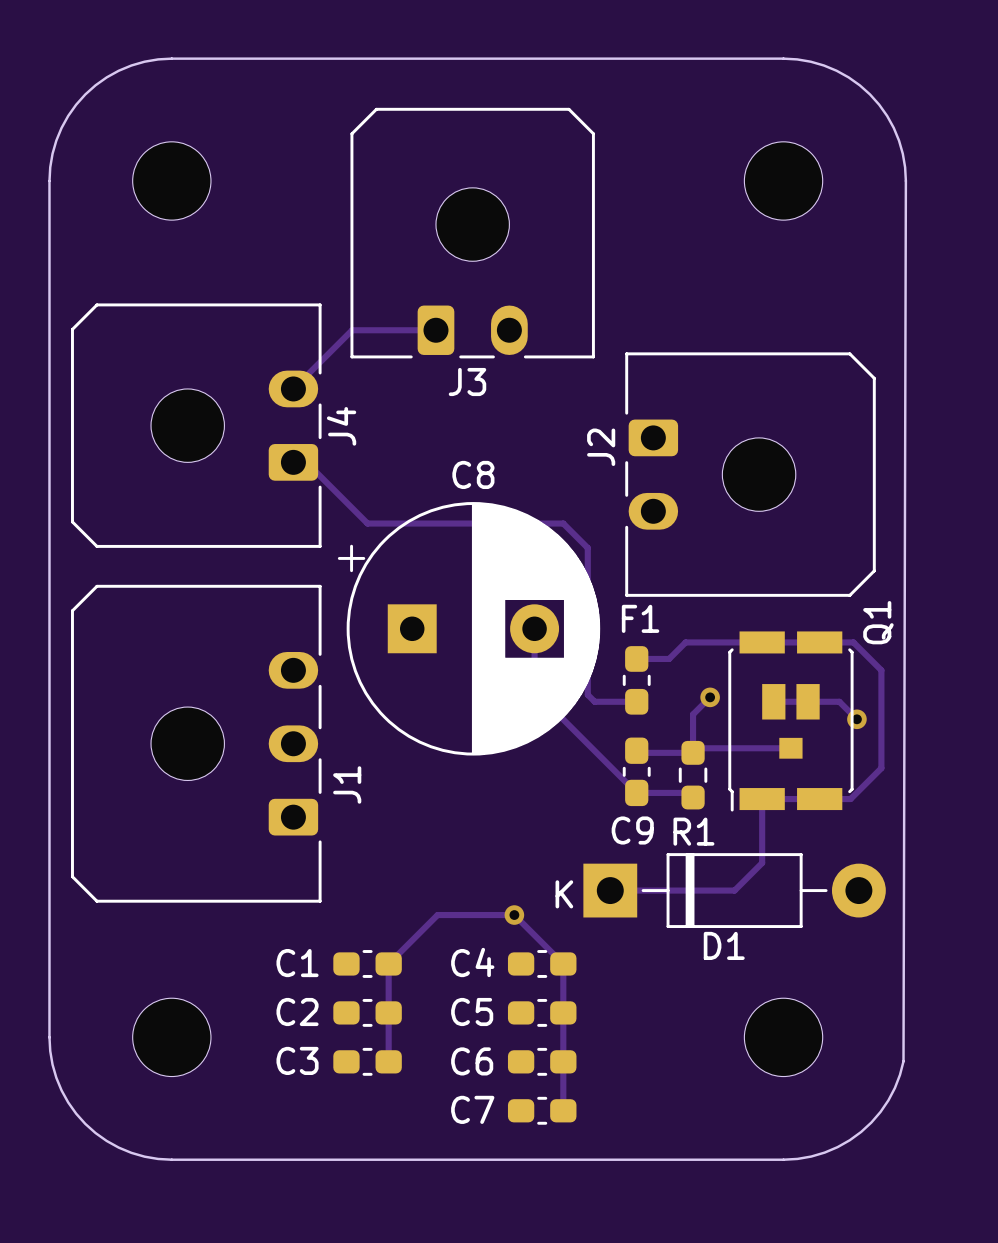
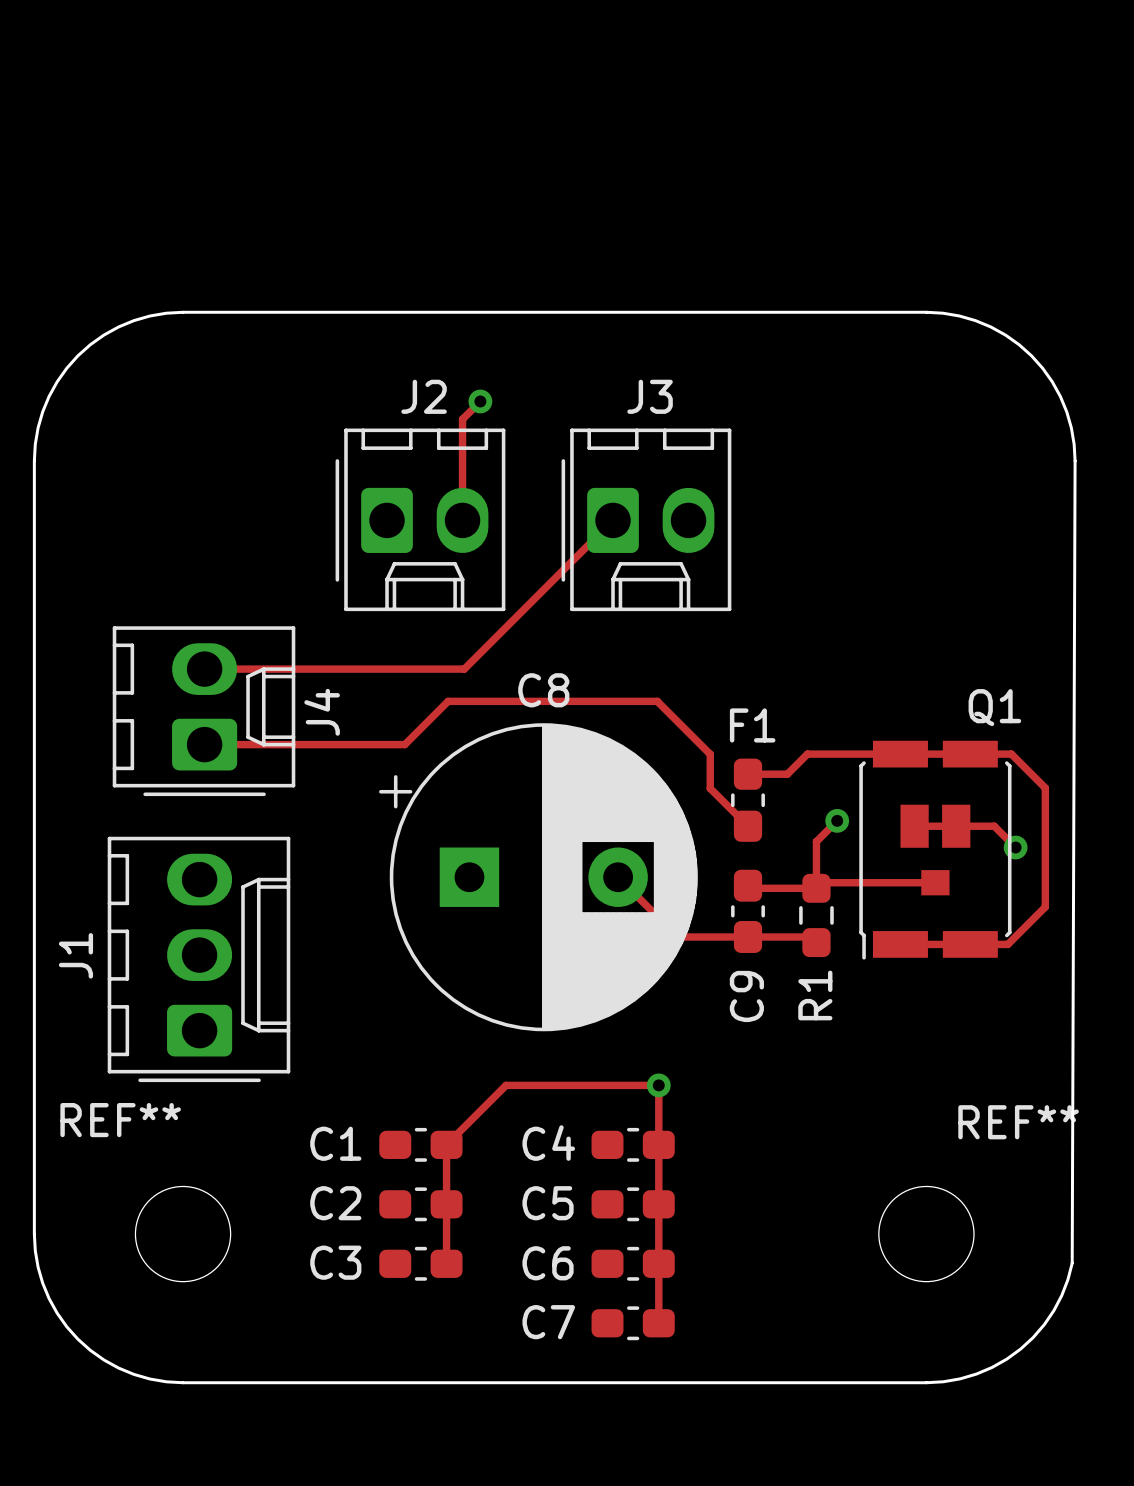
J3 footprint: [350, 107, 595, 359] -> [561, 428, 732, 612]
part: (171, 180) -> none
part: (783, 180) -> none
J4 footprint: [71, 303, 322, 548] -> [112, 626, 296, 797]
track: (435, 330) (352, 330) (293, 388) -> none
track: none -> (480, 401) (462, 419) (462, 520)
via: none -> (480, 401)
J2 footprint: [625, 352, 876, 597] -> [335, 428, 506, 612]
J3 name position: J3 (467, 382) -> J3 (650, 396)
board edge: (49, 401) (49, 180) (52, 153) (61, 127) (76, 104) (95, 85) (118, 70) (131, 65) (144, 61) (171, 58) (783, 58) (797, 59) (823, 65) (836, 70) (859, 85) (879, 104) (893, 127) (902, 153) (905, 180) (903, 1061) -> (34, 460) (38, 427) (42, 411) (57, 381) (77, 355) (103, 335) (118, 327) (133, 320) (166, 313) (926, 312) (943, 313) (975, 320) (990, 327) (1019, 344) (1042, 368) (1060, 396) (1071, 427) (1074, 444) (1072, 1263)
J2 name position: J2 (601, 447) -> J2 (424, 396)
track: none -> (613, 520) (464, 669) (204, 669)
track: (293, 462) (306, 462) (367, 523) (563, 523) (587, 548) (587, 694) (594, 701) (636, 701) -> (204, 744) (404, 744) (448, 701) (657, 701) (710, 754) (710, 788) (748, 826)
J1 footprint: [71, 584, 322, 903] -> [107, 836, 291, 1083]
Q1 name rotation: 0° (878, 622) -> 90° clockwise (994, 707)
C8 position: (469, 628) -> (538, 877)
track: (534, 628) (534, 690) (636, 792) -> (618, 877) (677, 936) (748, 936)
J1 name position: J1 (347, 784) -> J1 (75, 955)
track: (762, 799) (762, 862) (734, 890) (610, 890) -> none
C9 name rotation: 0° (632, 830) -> 90° counterclockwise (746, 996)
R1 name rotation: 0° (693, 831) -> 90° counterclockwise (815, 995)
D1: (734, 890) -> none
track: (514, 915) (563, 963) -> (599, 1085) (658, 1085) (658, 1144)
via position: (514, 915) -> (658, 1085)
REF** name: none -> REF** (120, 1120)
REF** name: none -> REF** (1018, 1122)

